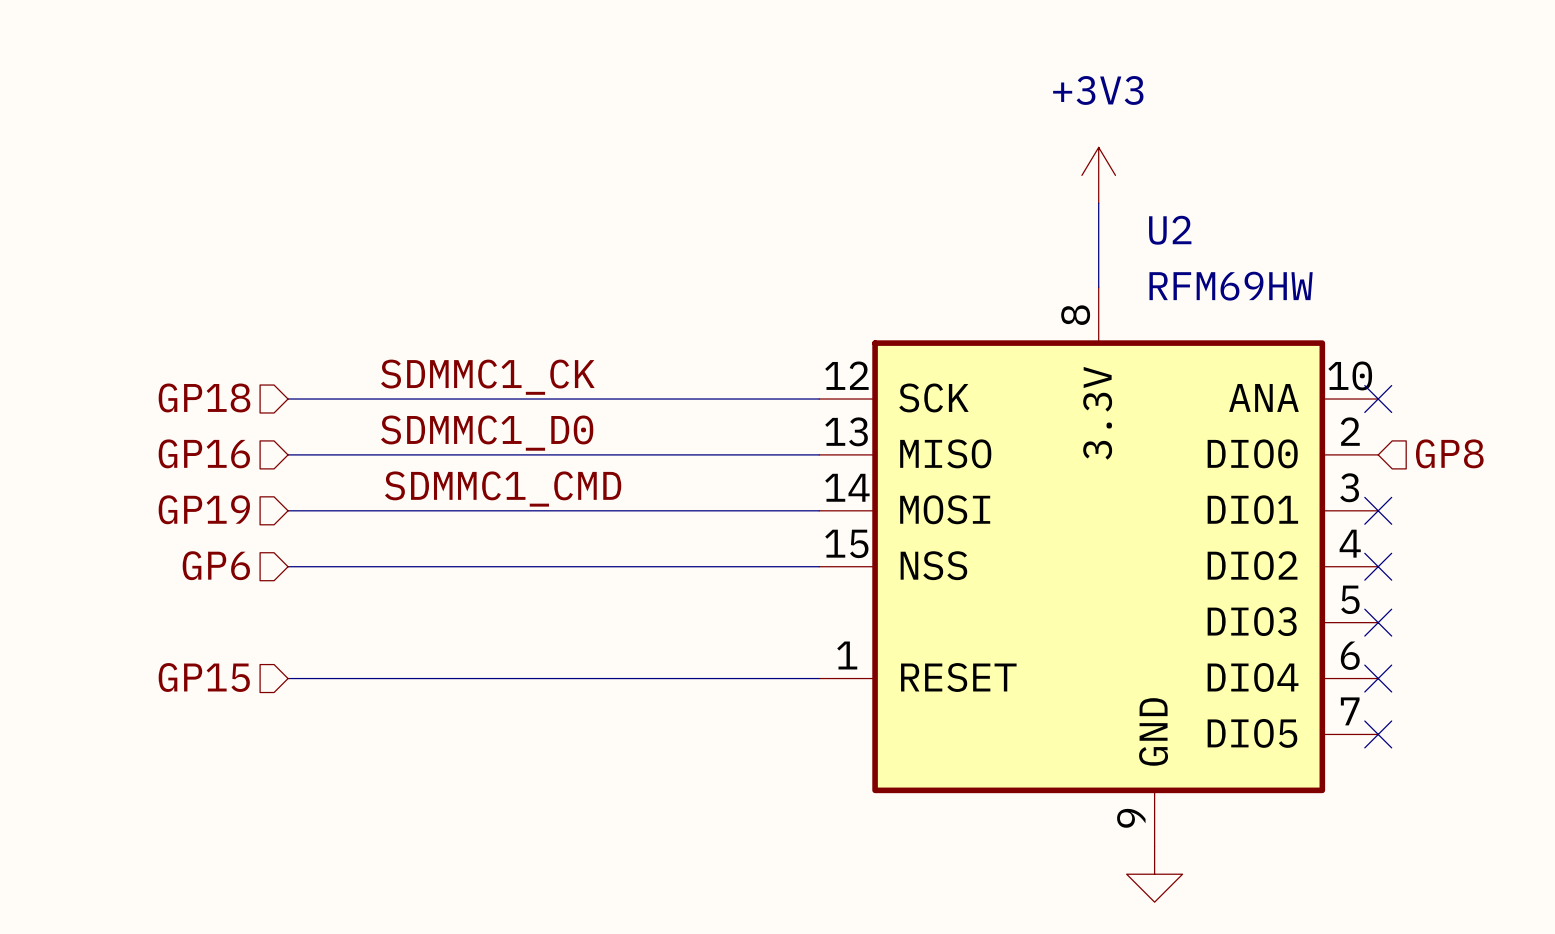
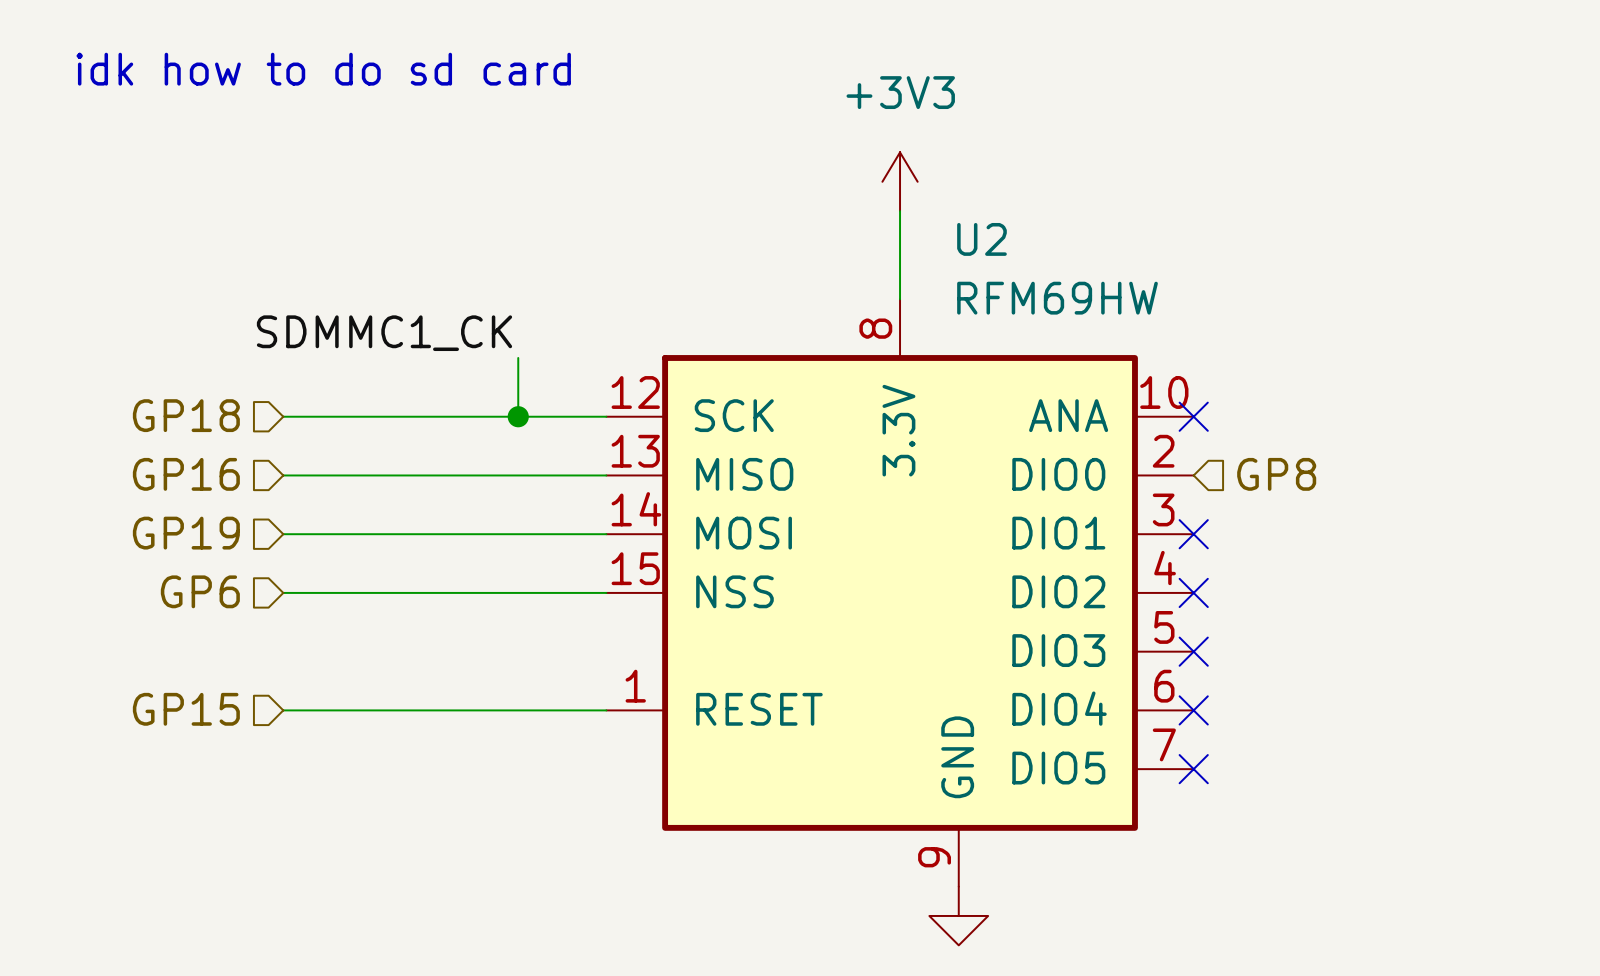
text: none -> idk how to do sd card (323, 69)
power symbol position: +3V3 (1098, 175) -> +3V3 (900, 181)
wire: (1098, 203) (1098, 287) -> (900, 211) (900, 299)
wire: none -> (518, 357) (518, 416)
label position: SDMMC1_CK (487, 377) -> SDMMC1_CK (384, 333)
junction: none -> (518, 416)
no-connect mark: none -> (1193, 416)
no-connect mark: (1378, 399) -> none
label: SDMMC1_D0 (487, 433) -> none
hierarchical label position: GP8 (1449, 453) -> GP8 (1276, 474)
label: SDMMC1_CMD (503, 489) -> none
no-connect mark: none -> (1193, 534)
no-connect mark: (1378, 510) -> none
U2 position: (1098, 566) -> (900, 592)
no-connect mark: none -> (1193, 592)
no-connect mark: (1378, 566) -> none
no-connect mark: none -> (1193, 651)
no-connect mark: (1378, 622) -> none
no-connect mark: none -> (1193, 710)
no-connect mark: (1378, 678) -> none
no-connect mark: none -> (1193, 769)
no-connect mark: (1378, 734) -> none
power symbol position: (1154, 874) -> (958, 915)

